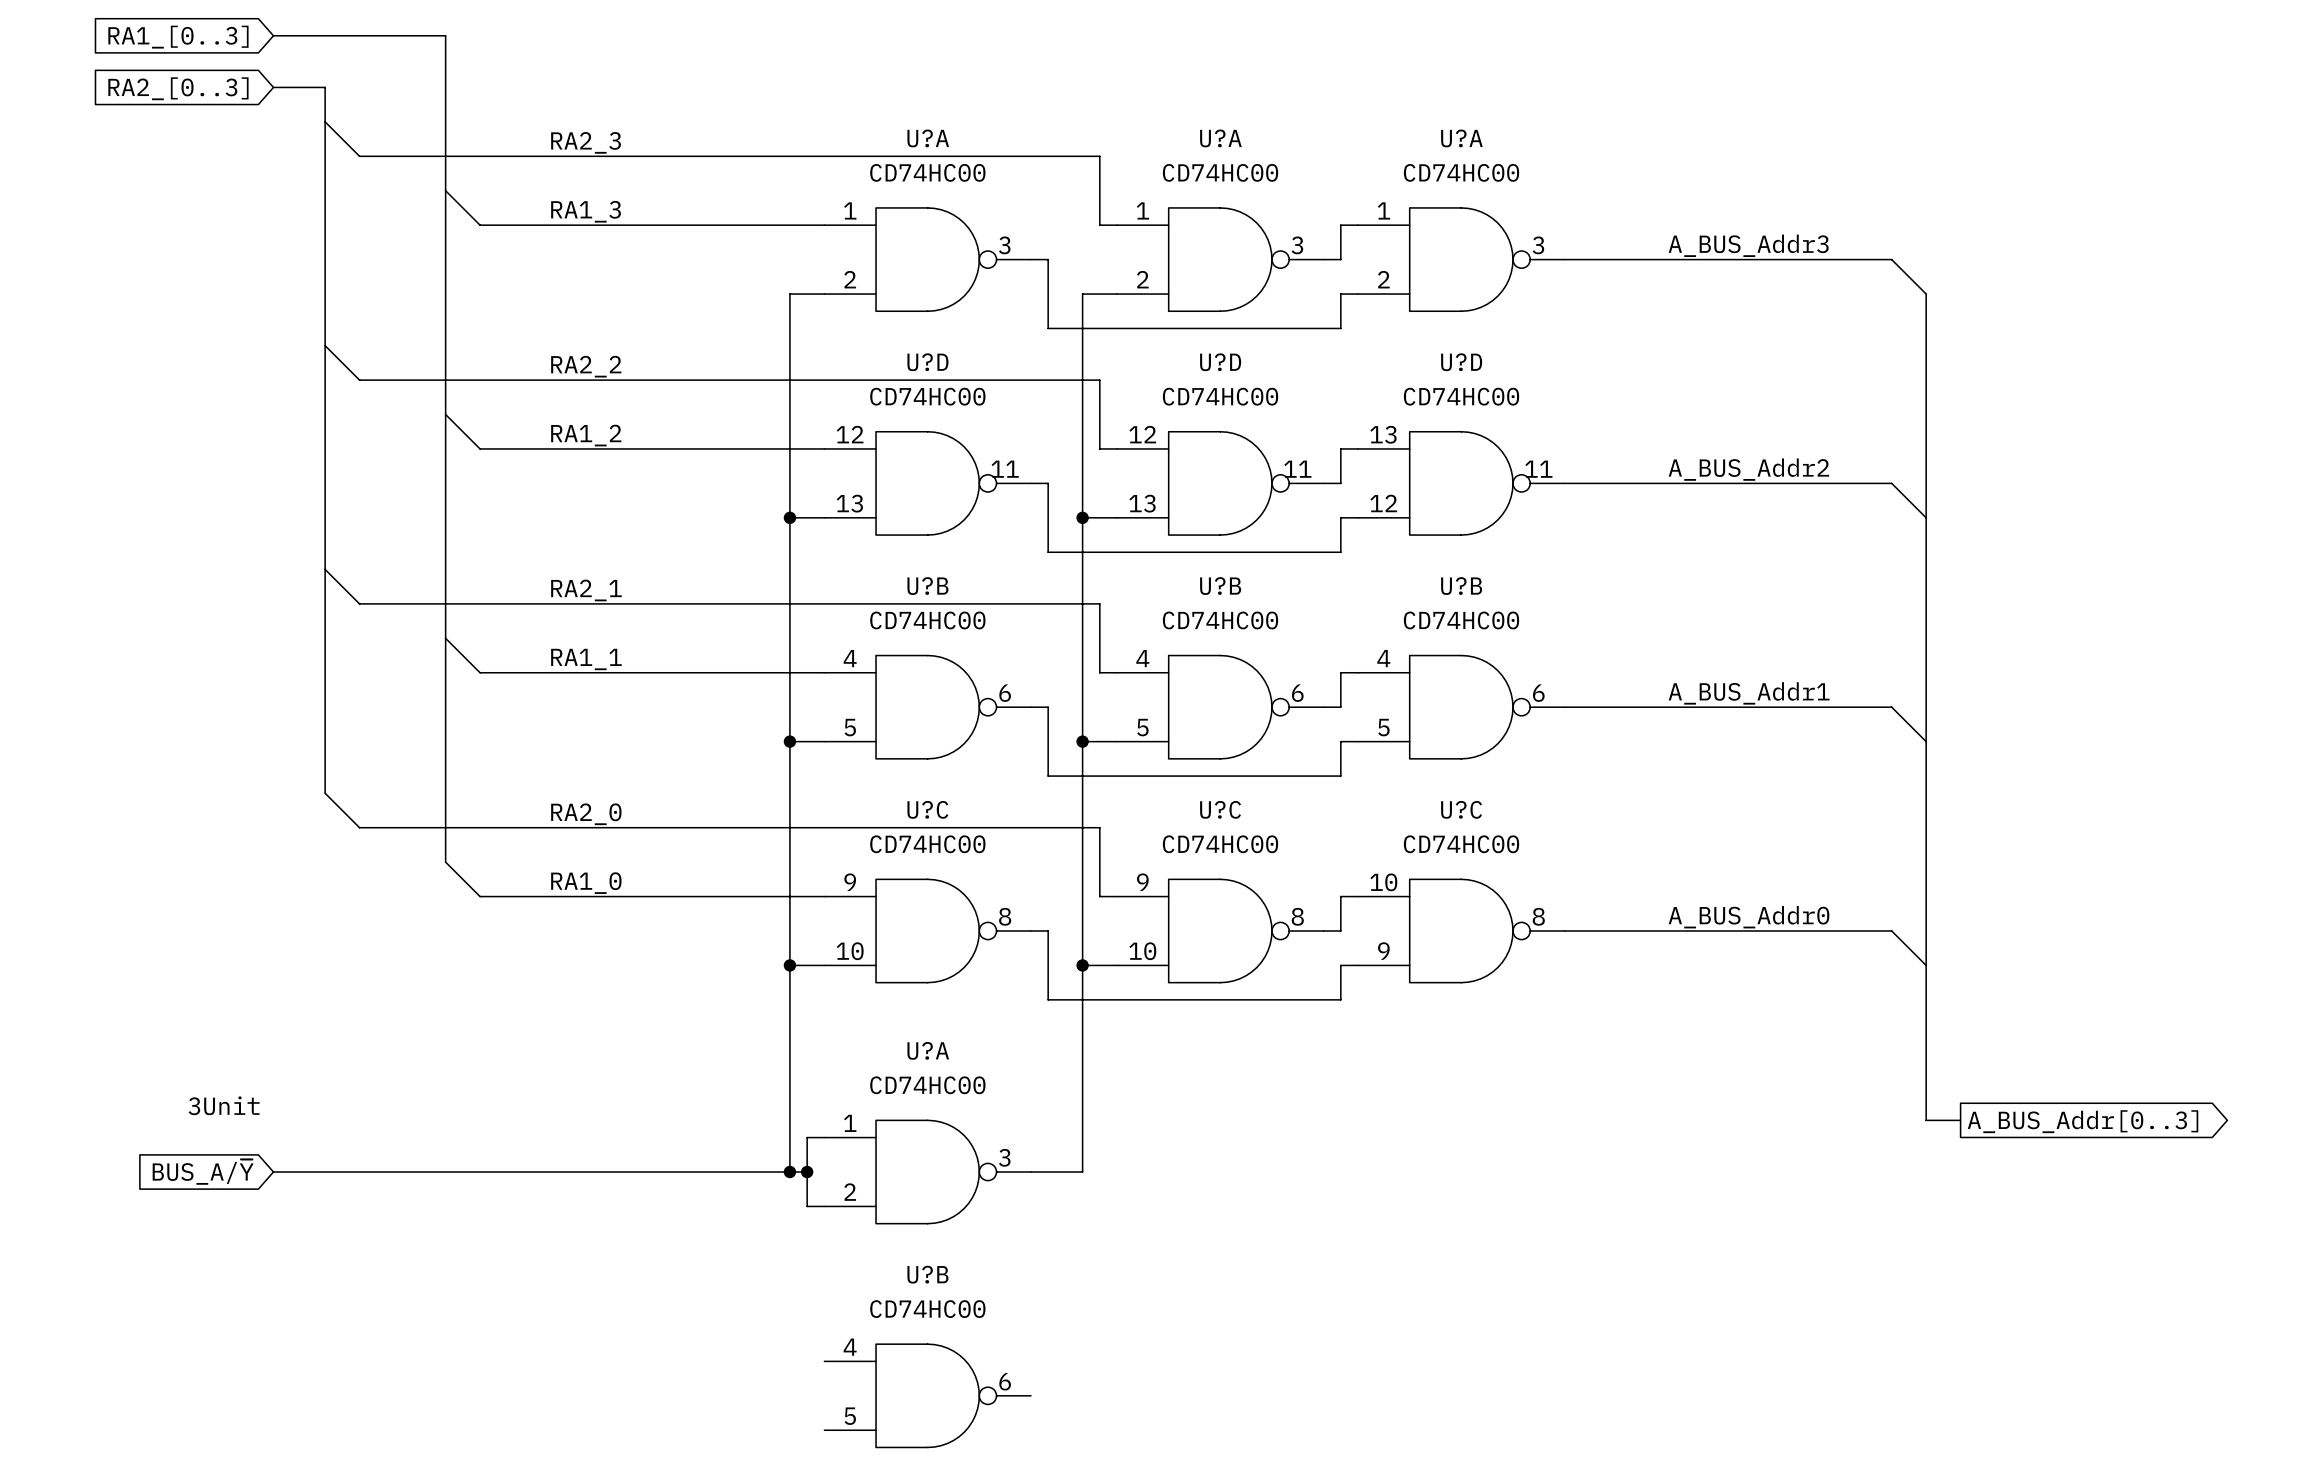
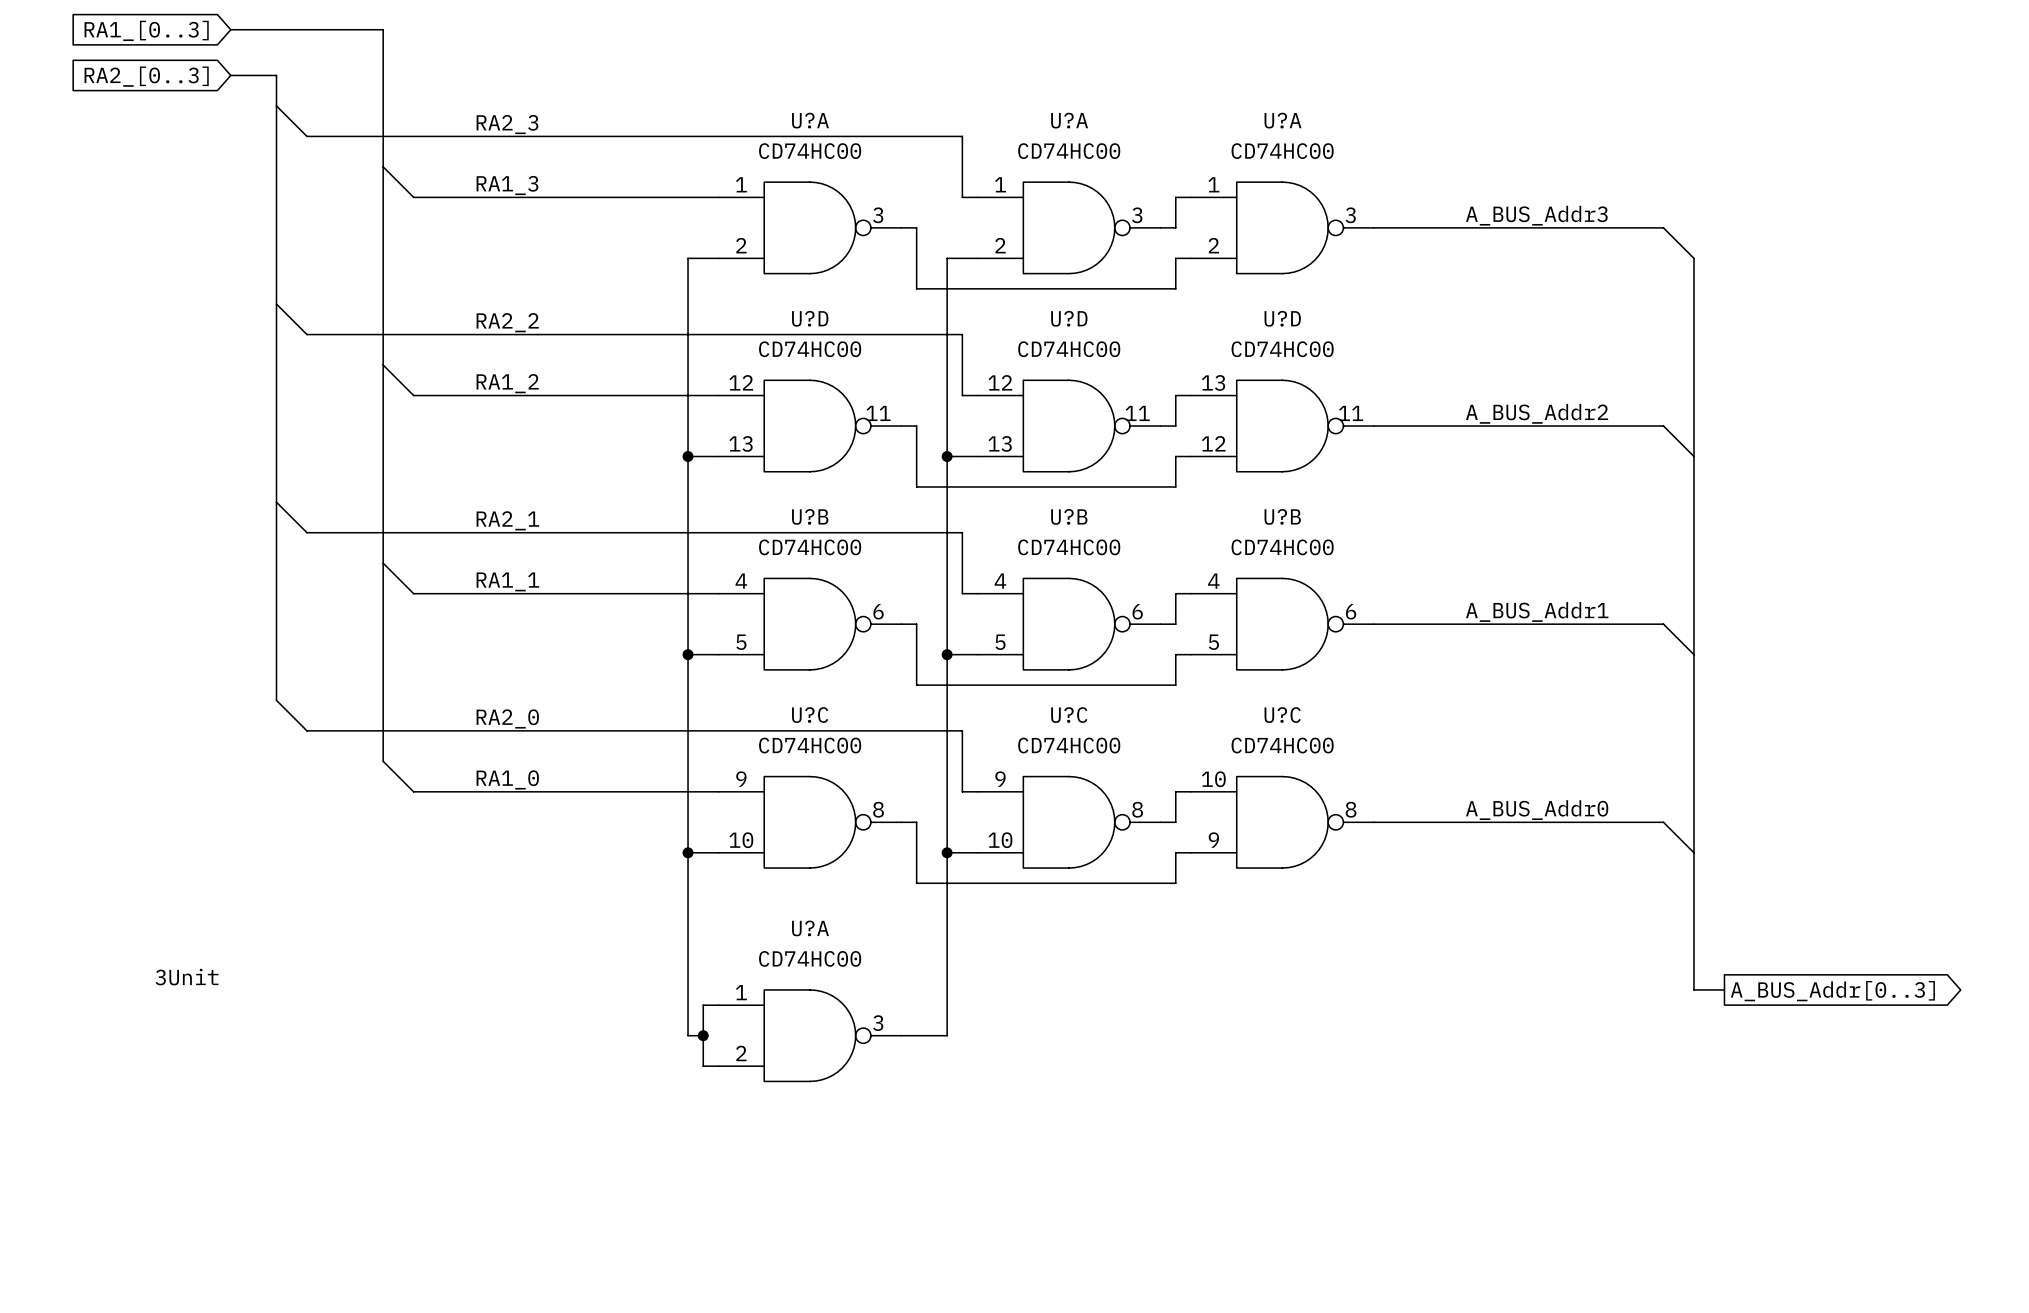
global label: BUS_A/~{Y} (203, 1172) -> none
wire: (273, 1172) (789, 1172) -> none
junction: (789, 1172) -> none
U?B: CD74HC00 (927, 1395) -> none

